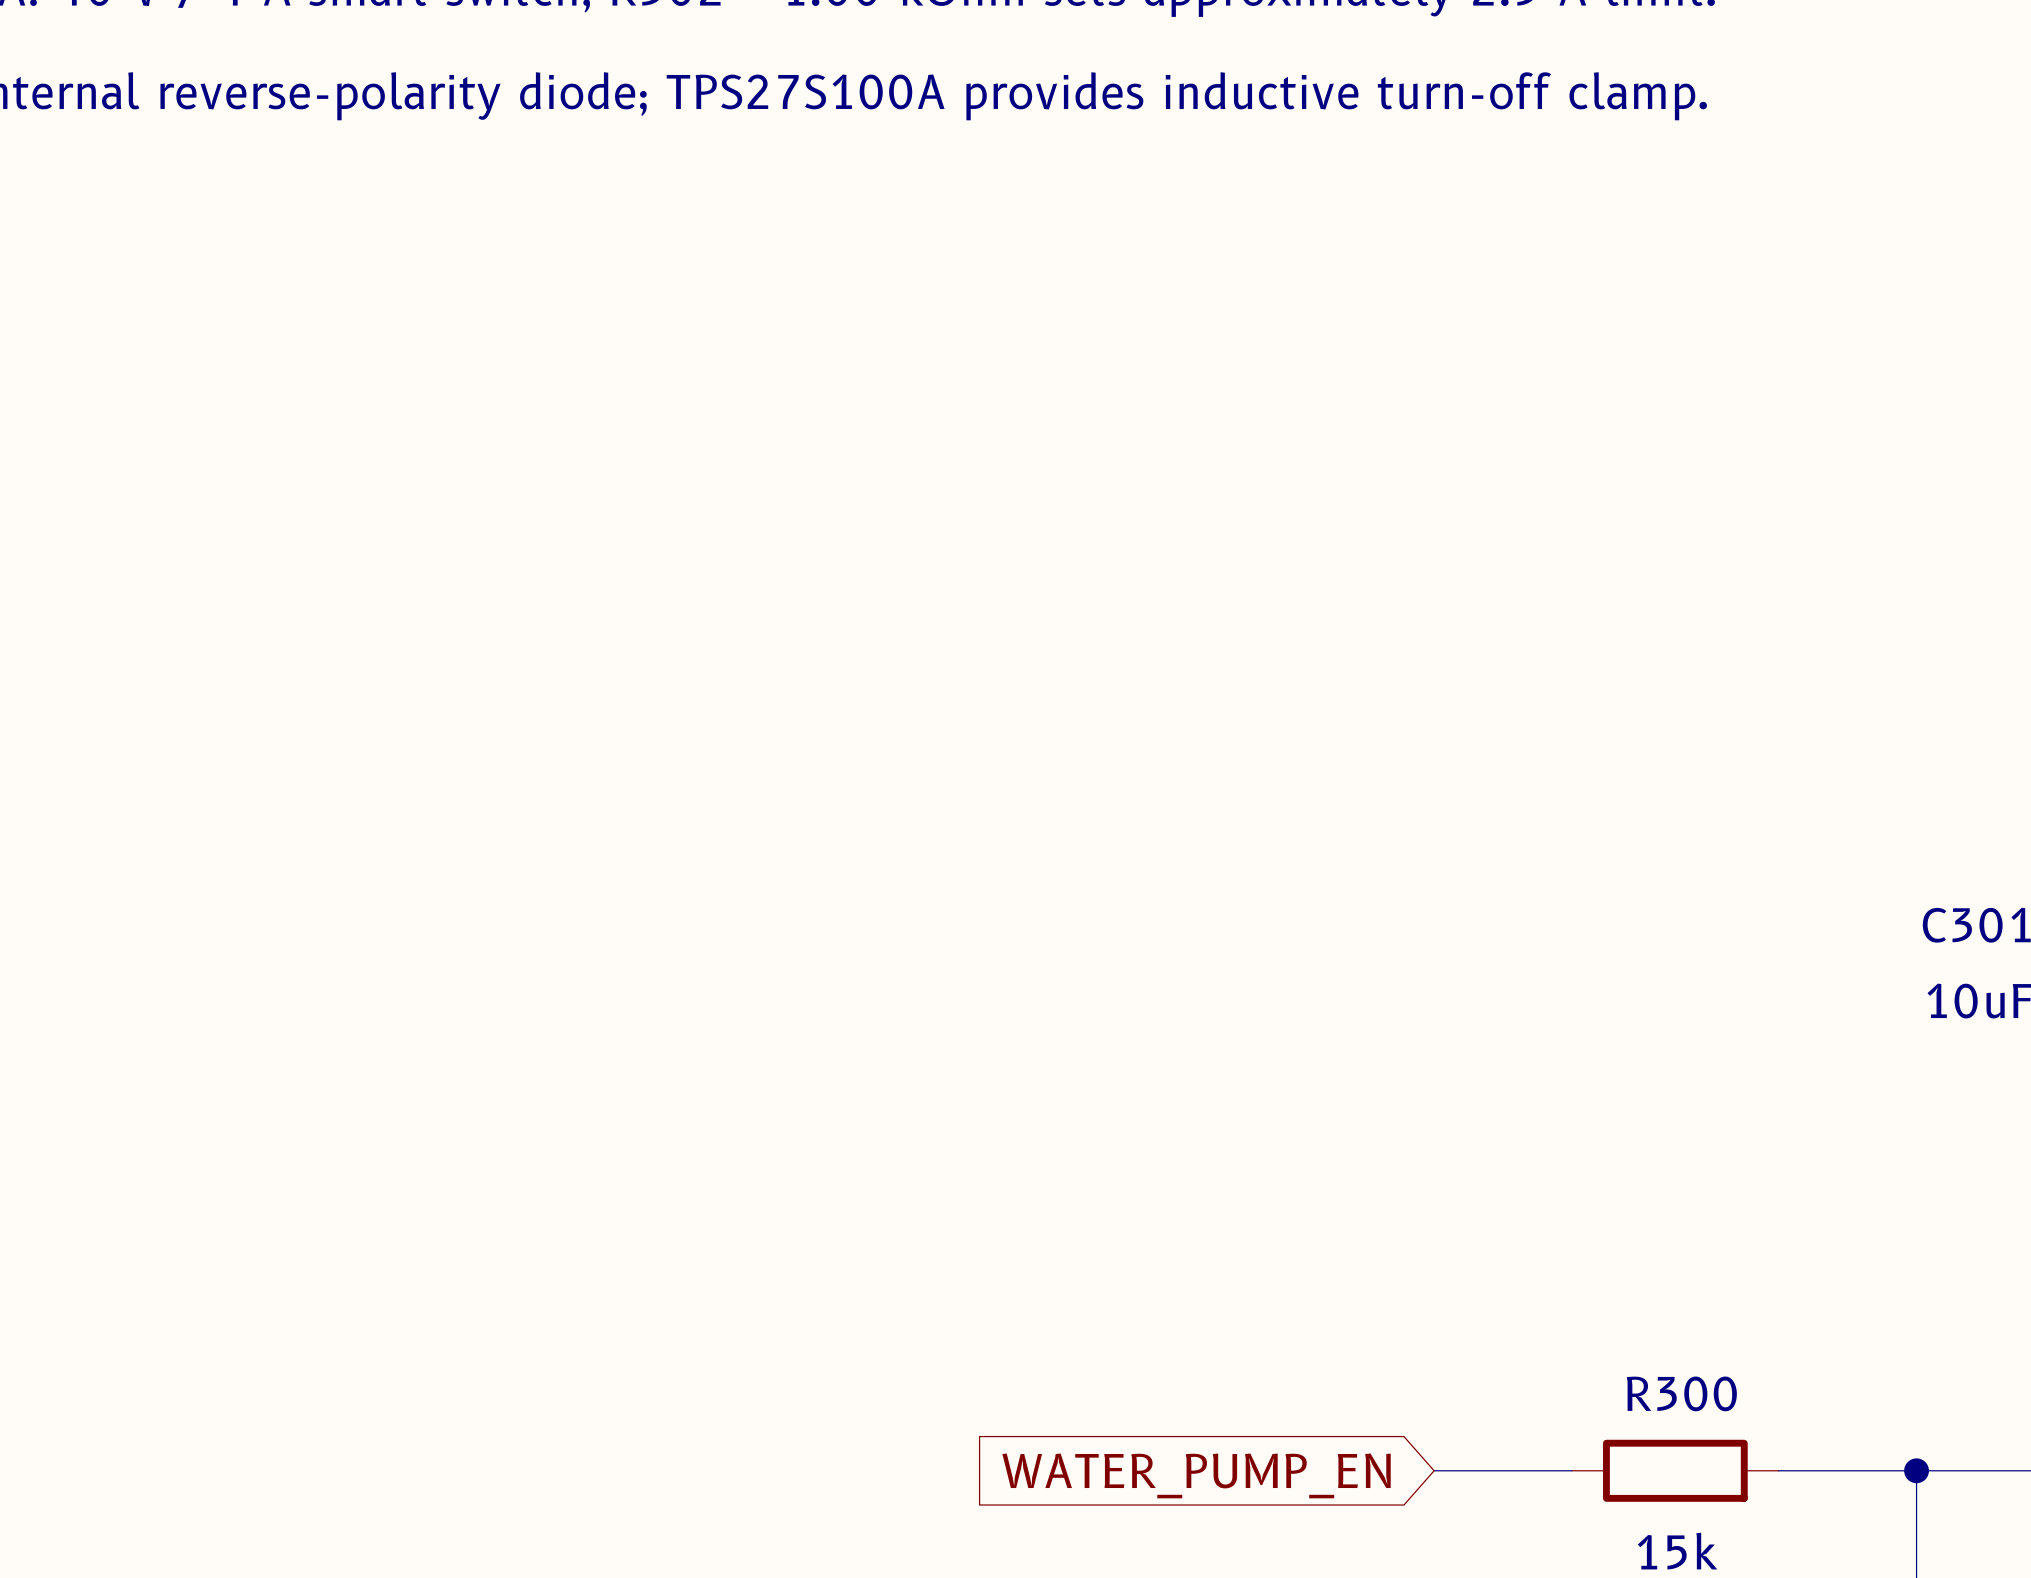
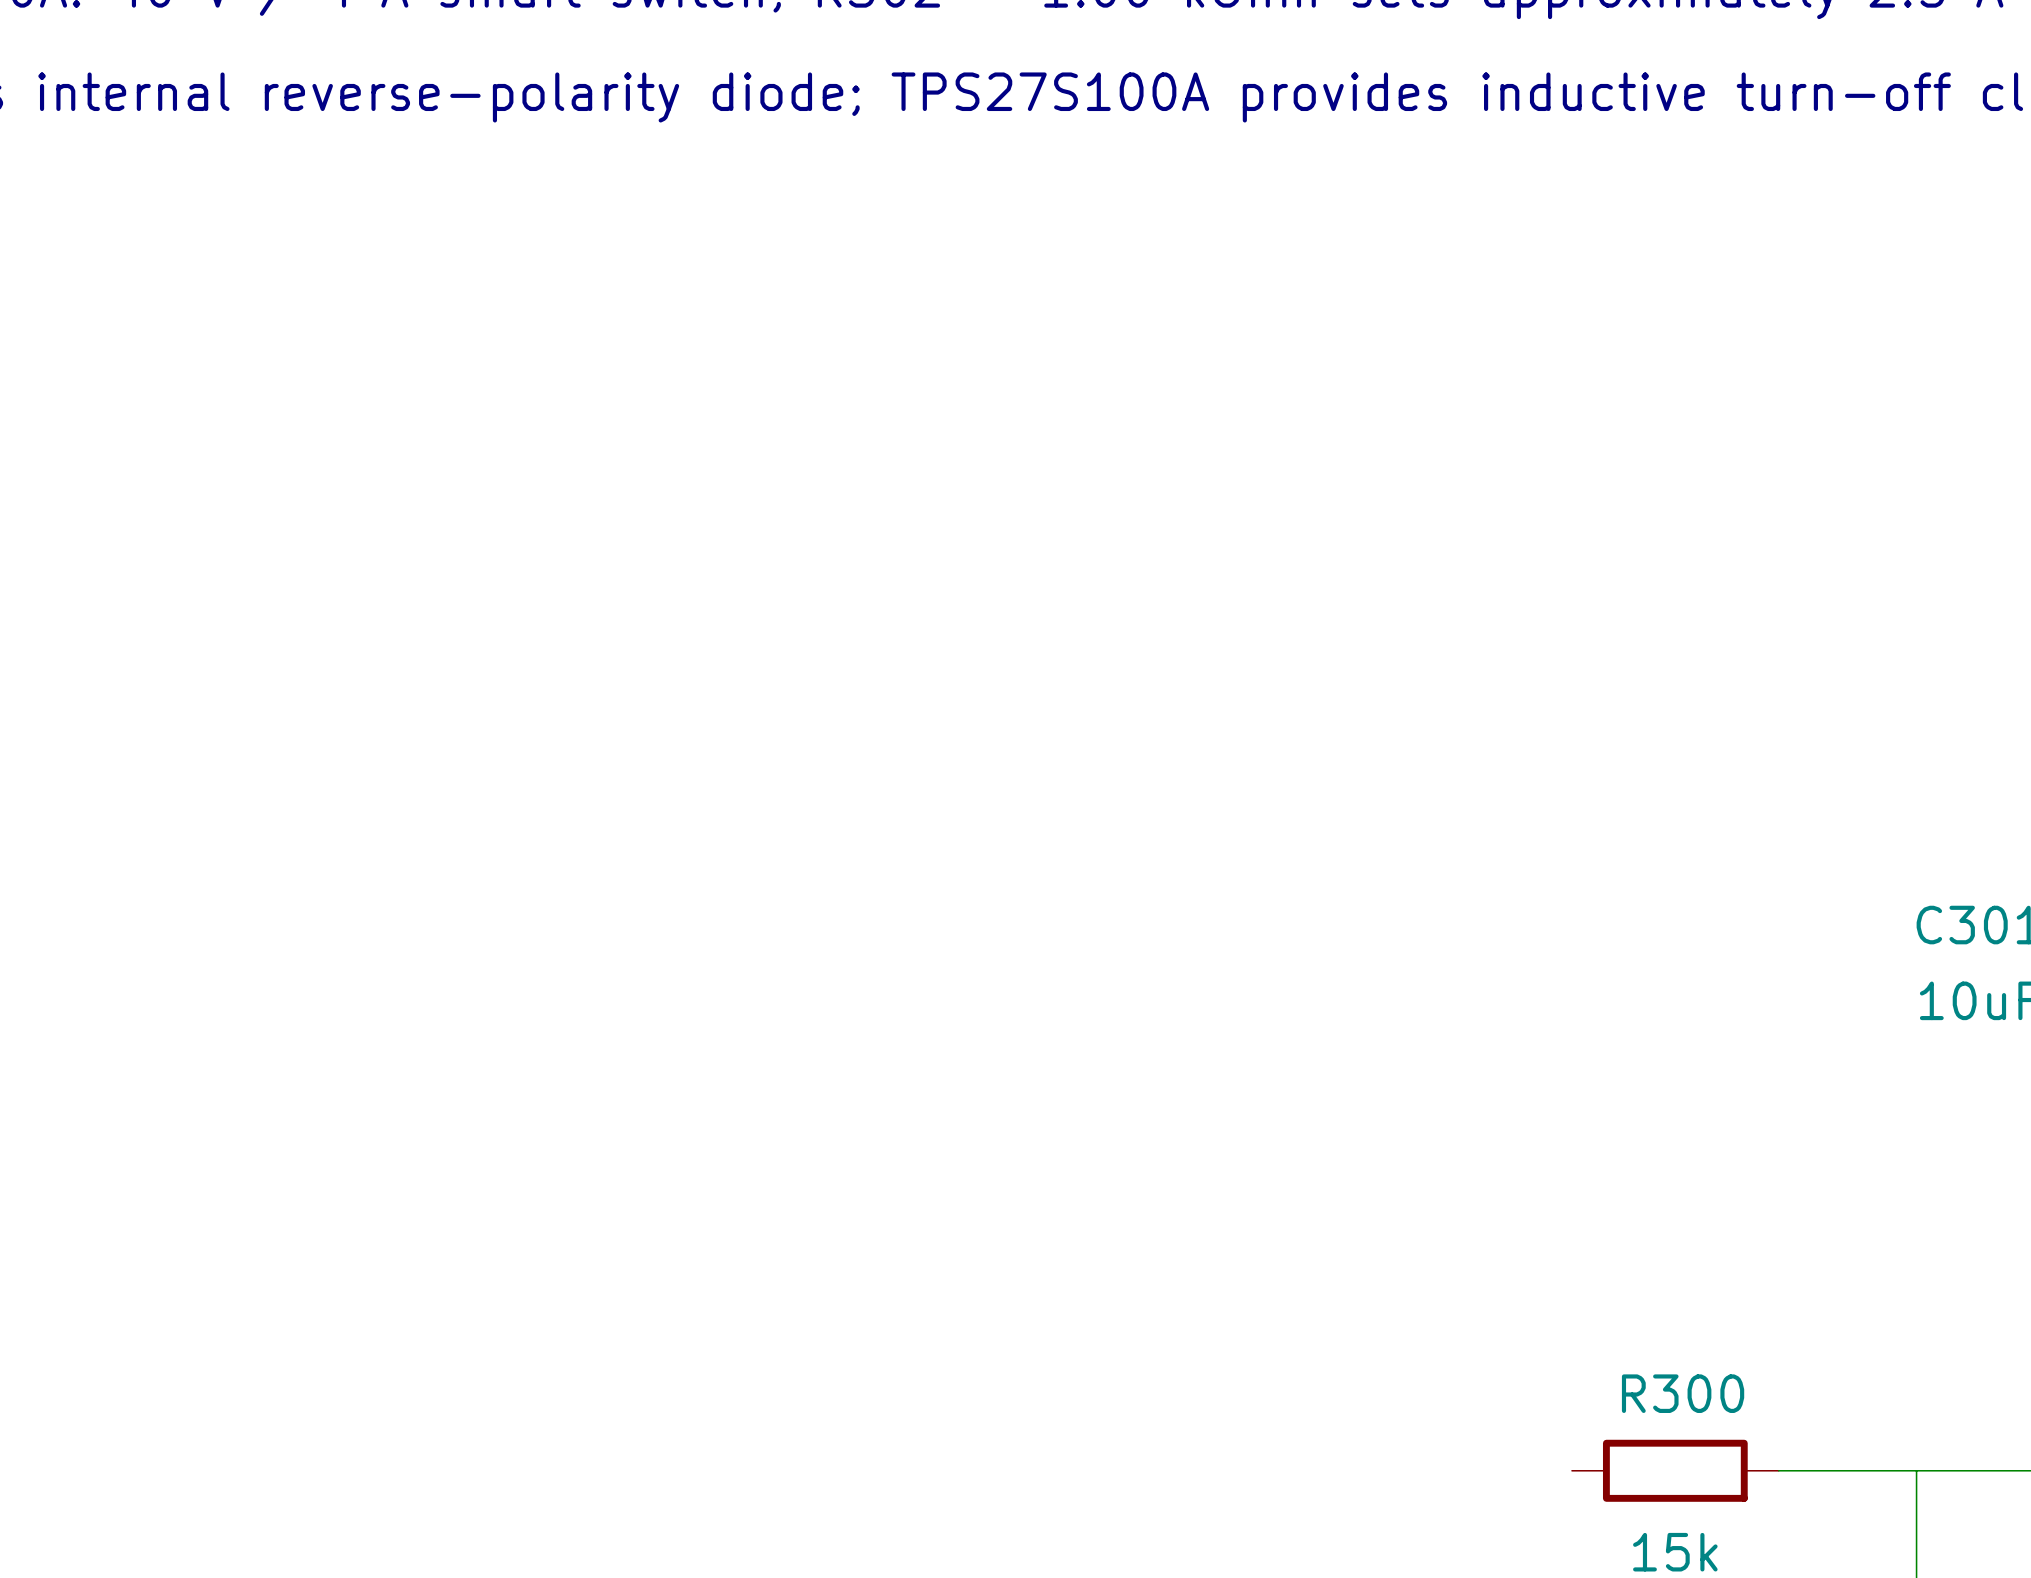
wire: (1434, 1470) (1571, 1470) -> none
junction: (1916, 1470) -> none
global label: WATER_PUMP_EN (1196, 1475) -> none

